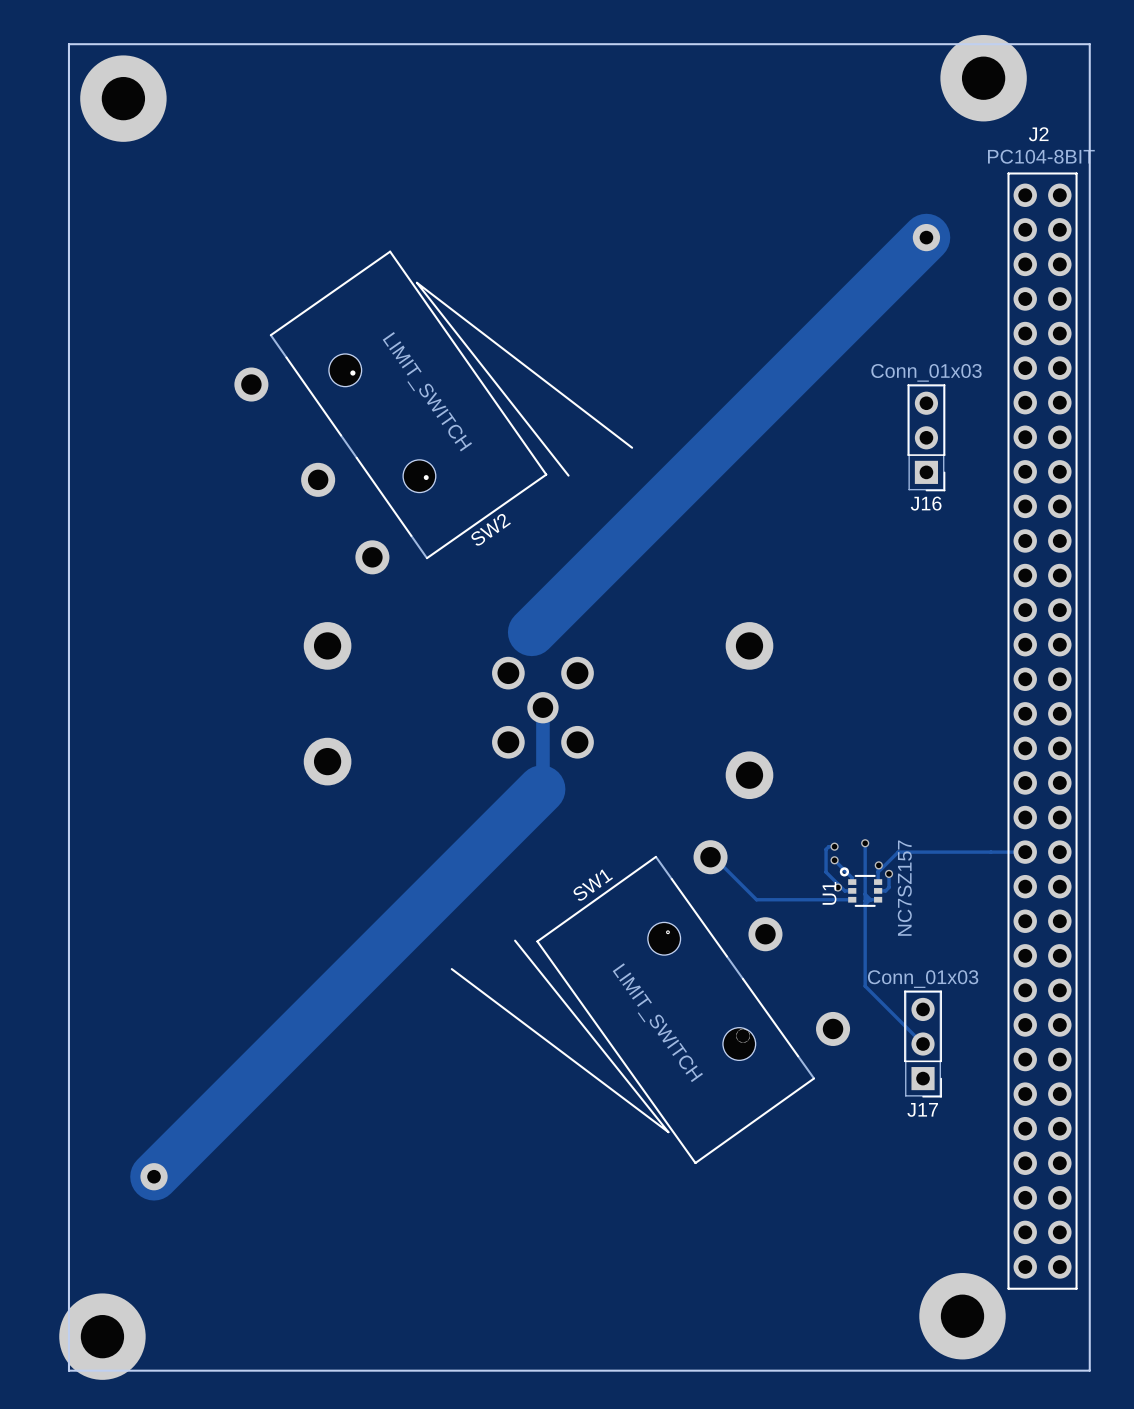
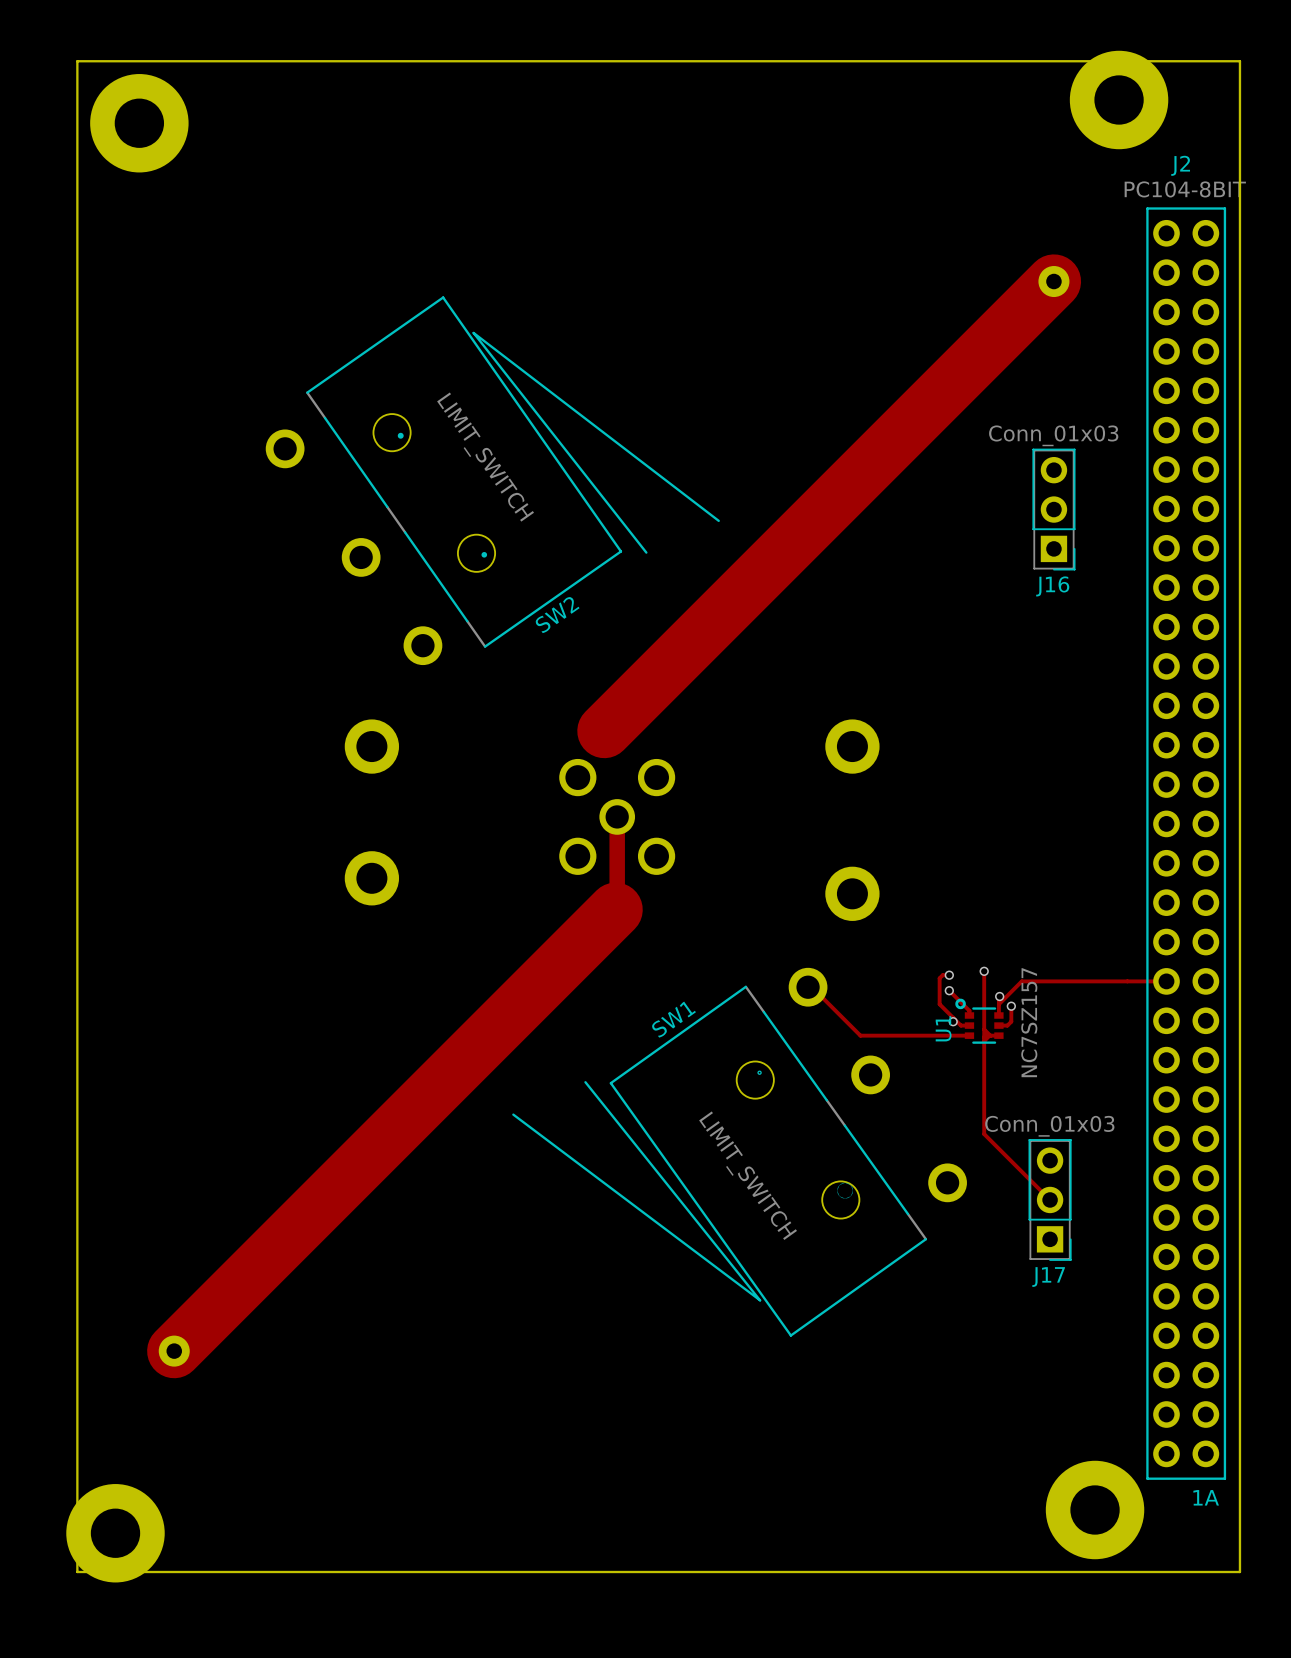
text: none -> 1A (1206, 1497)

